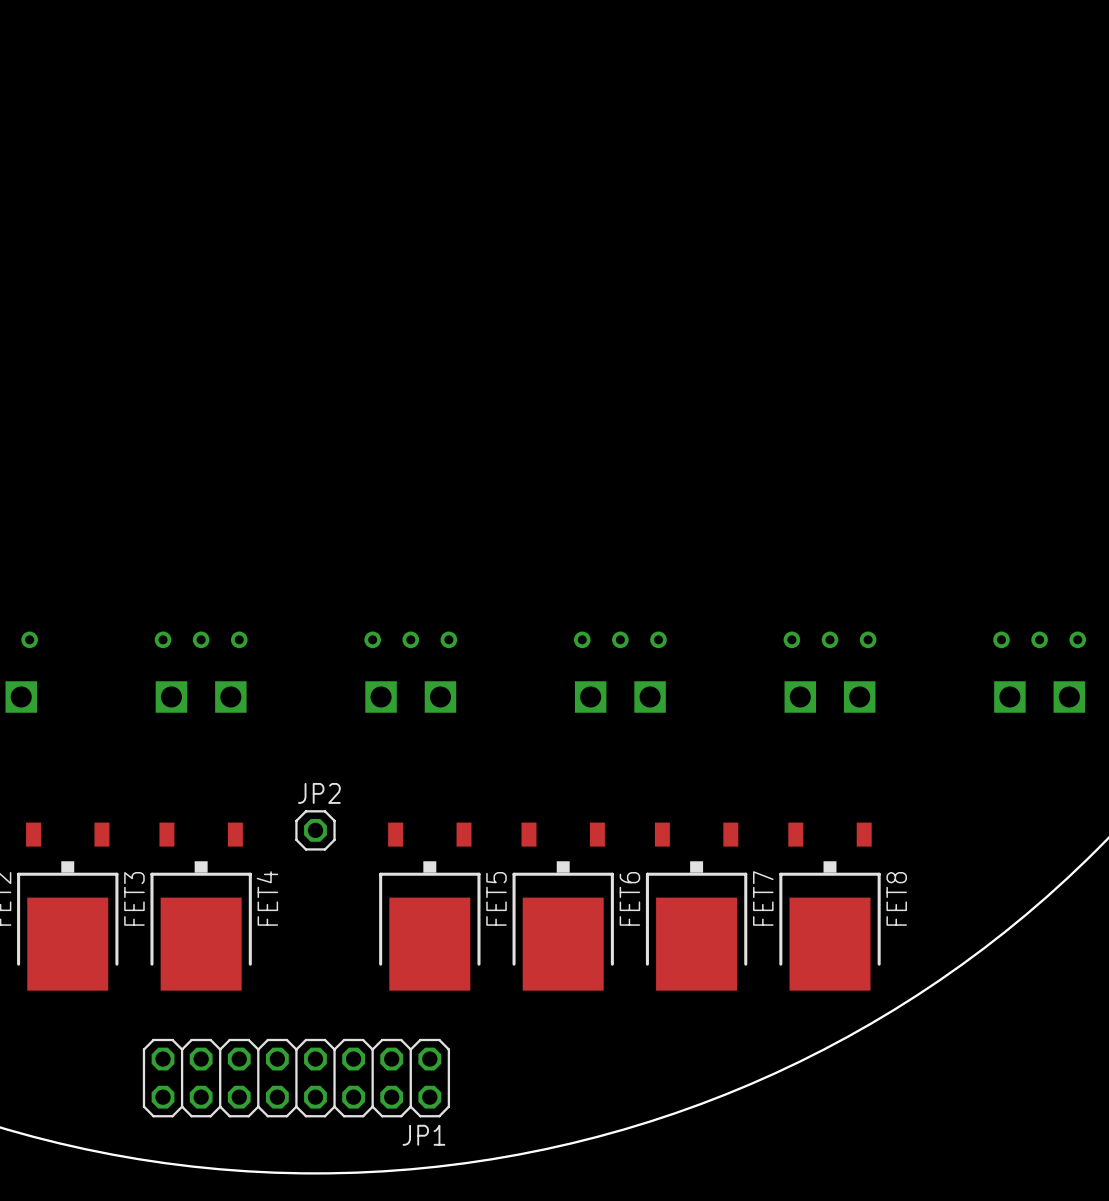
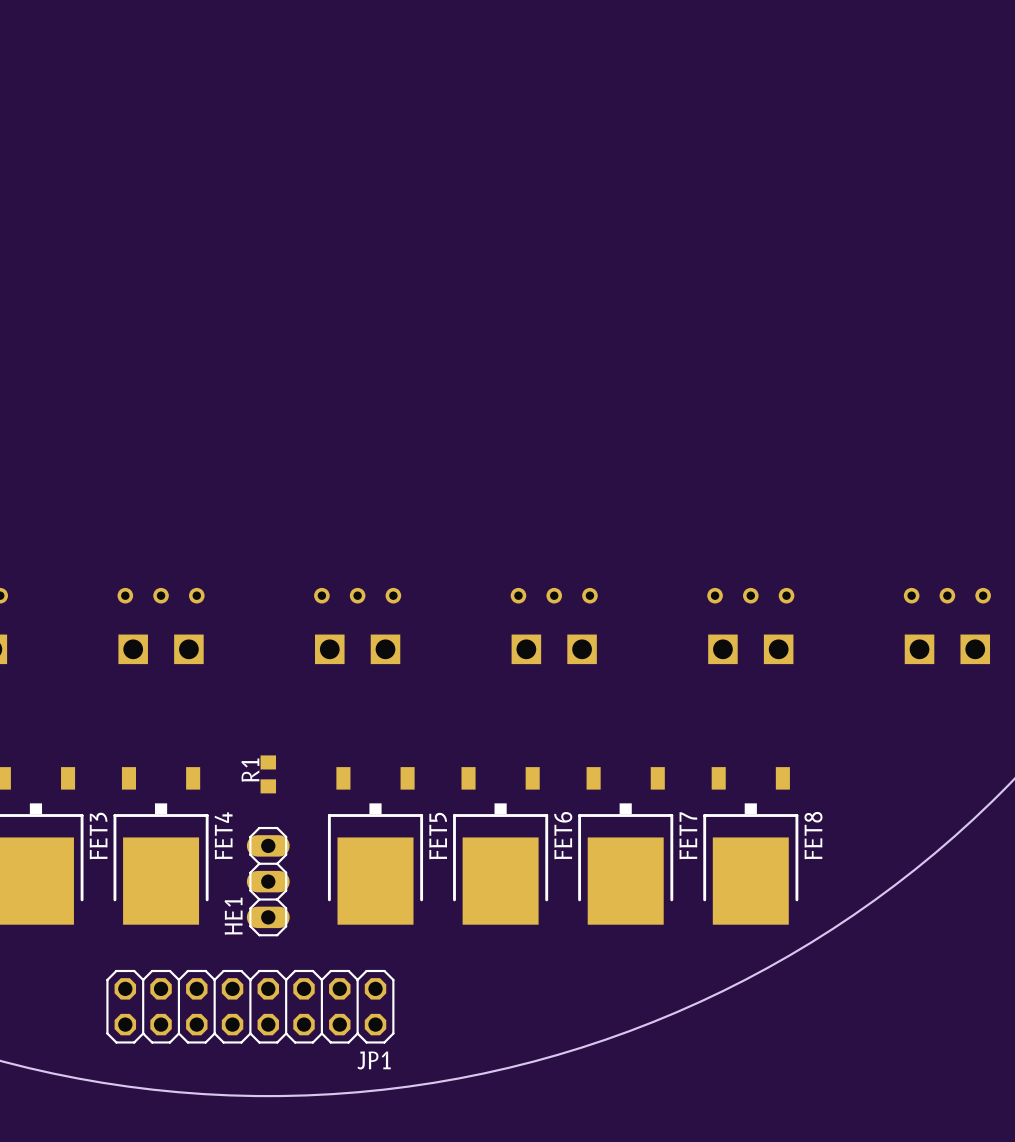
JP2: (315, 830) -> none
R1: none -> (268, 774)
HE1: none -> (268, 881)

